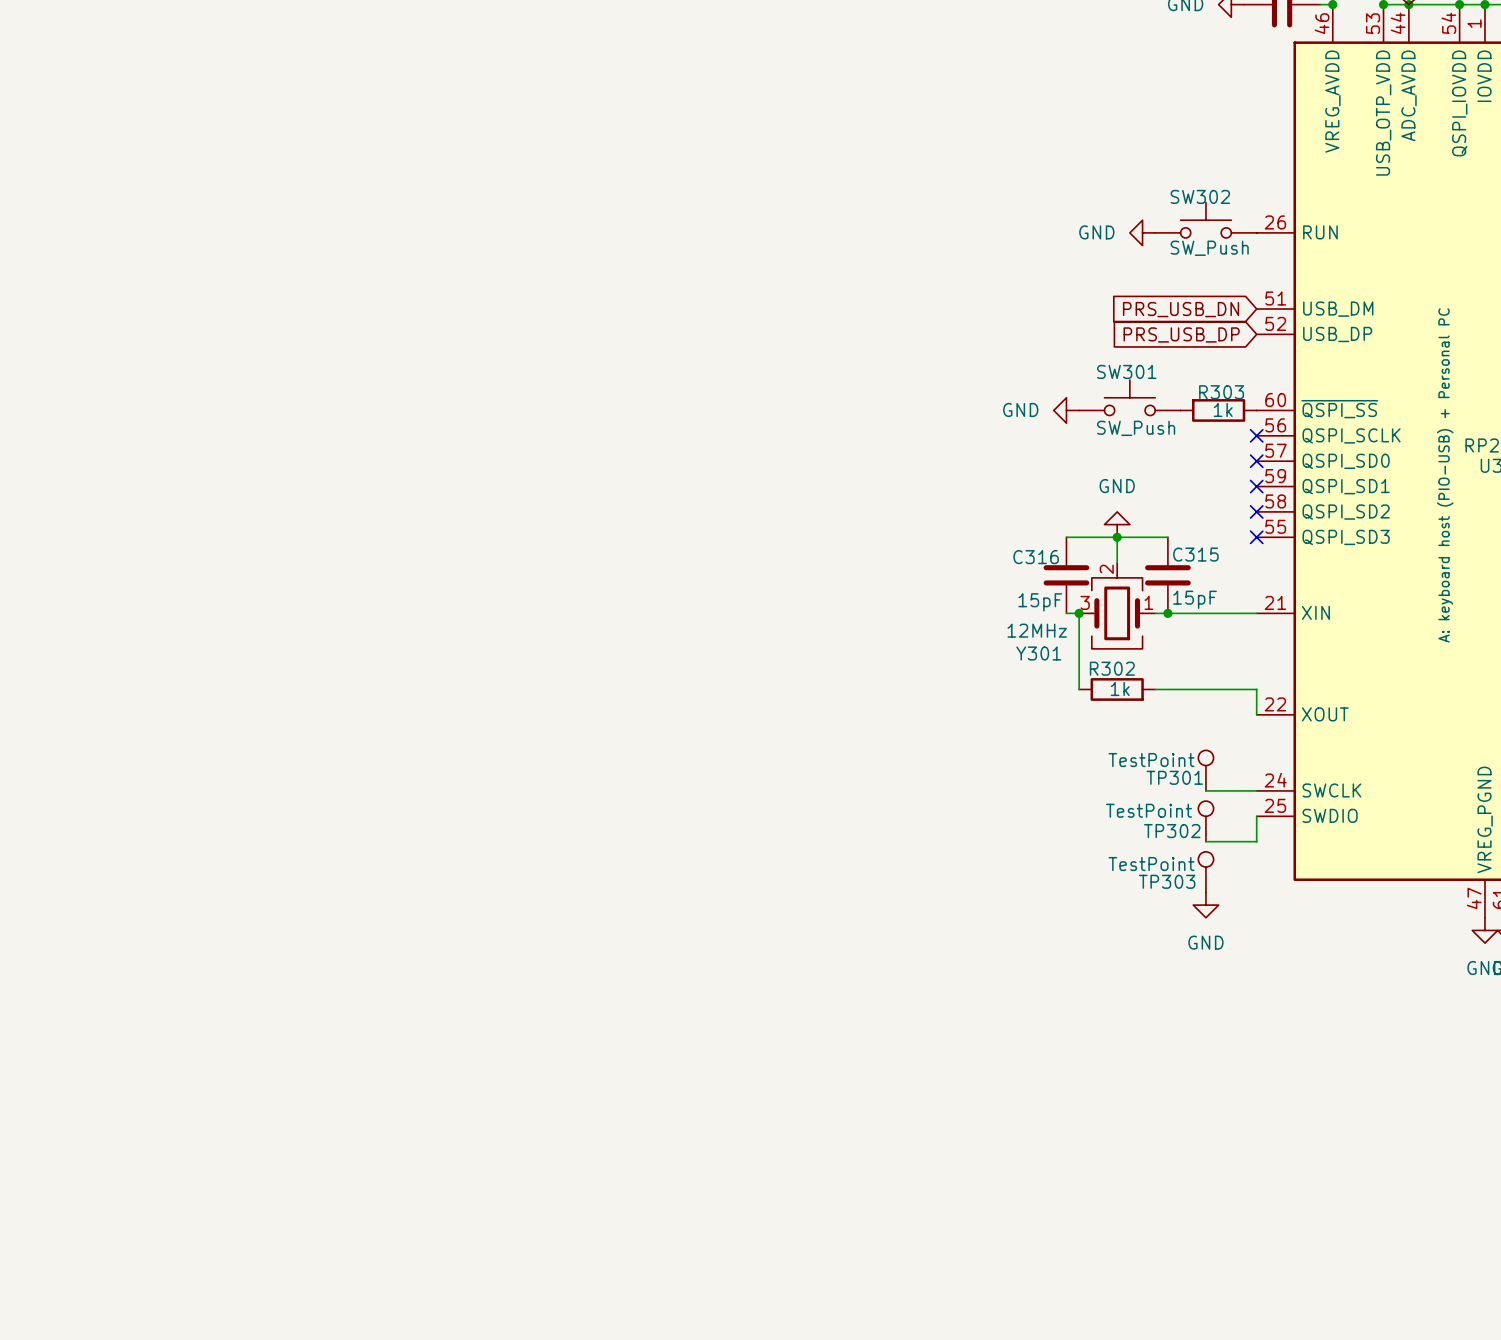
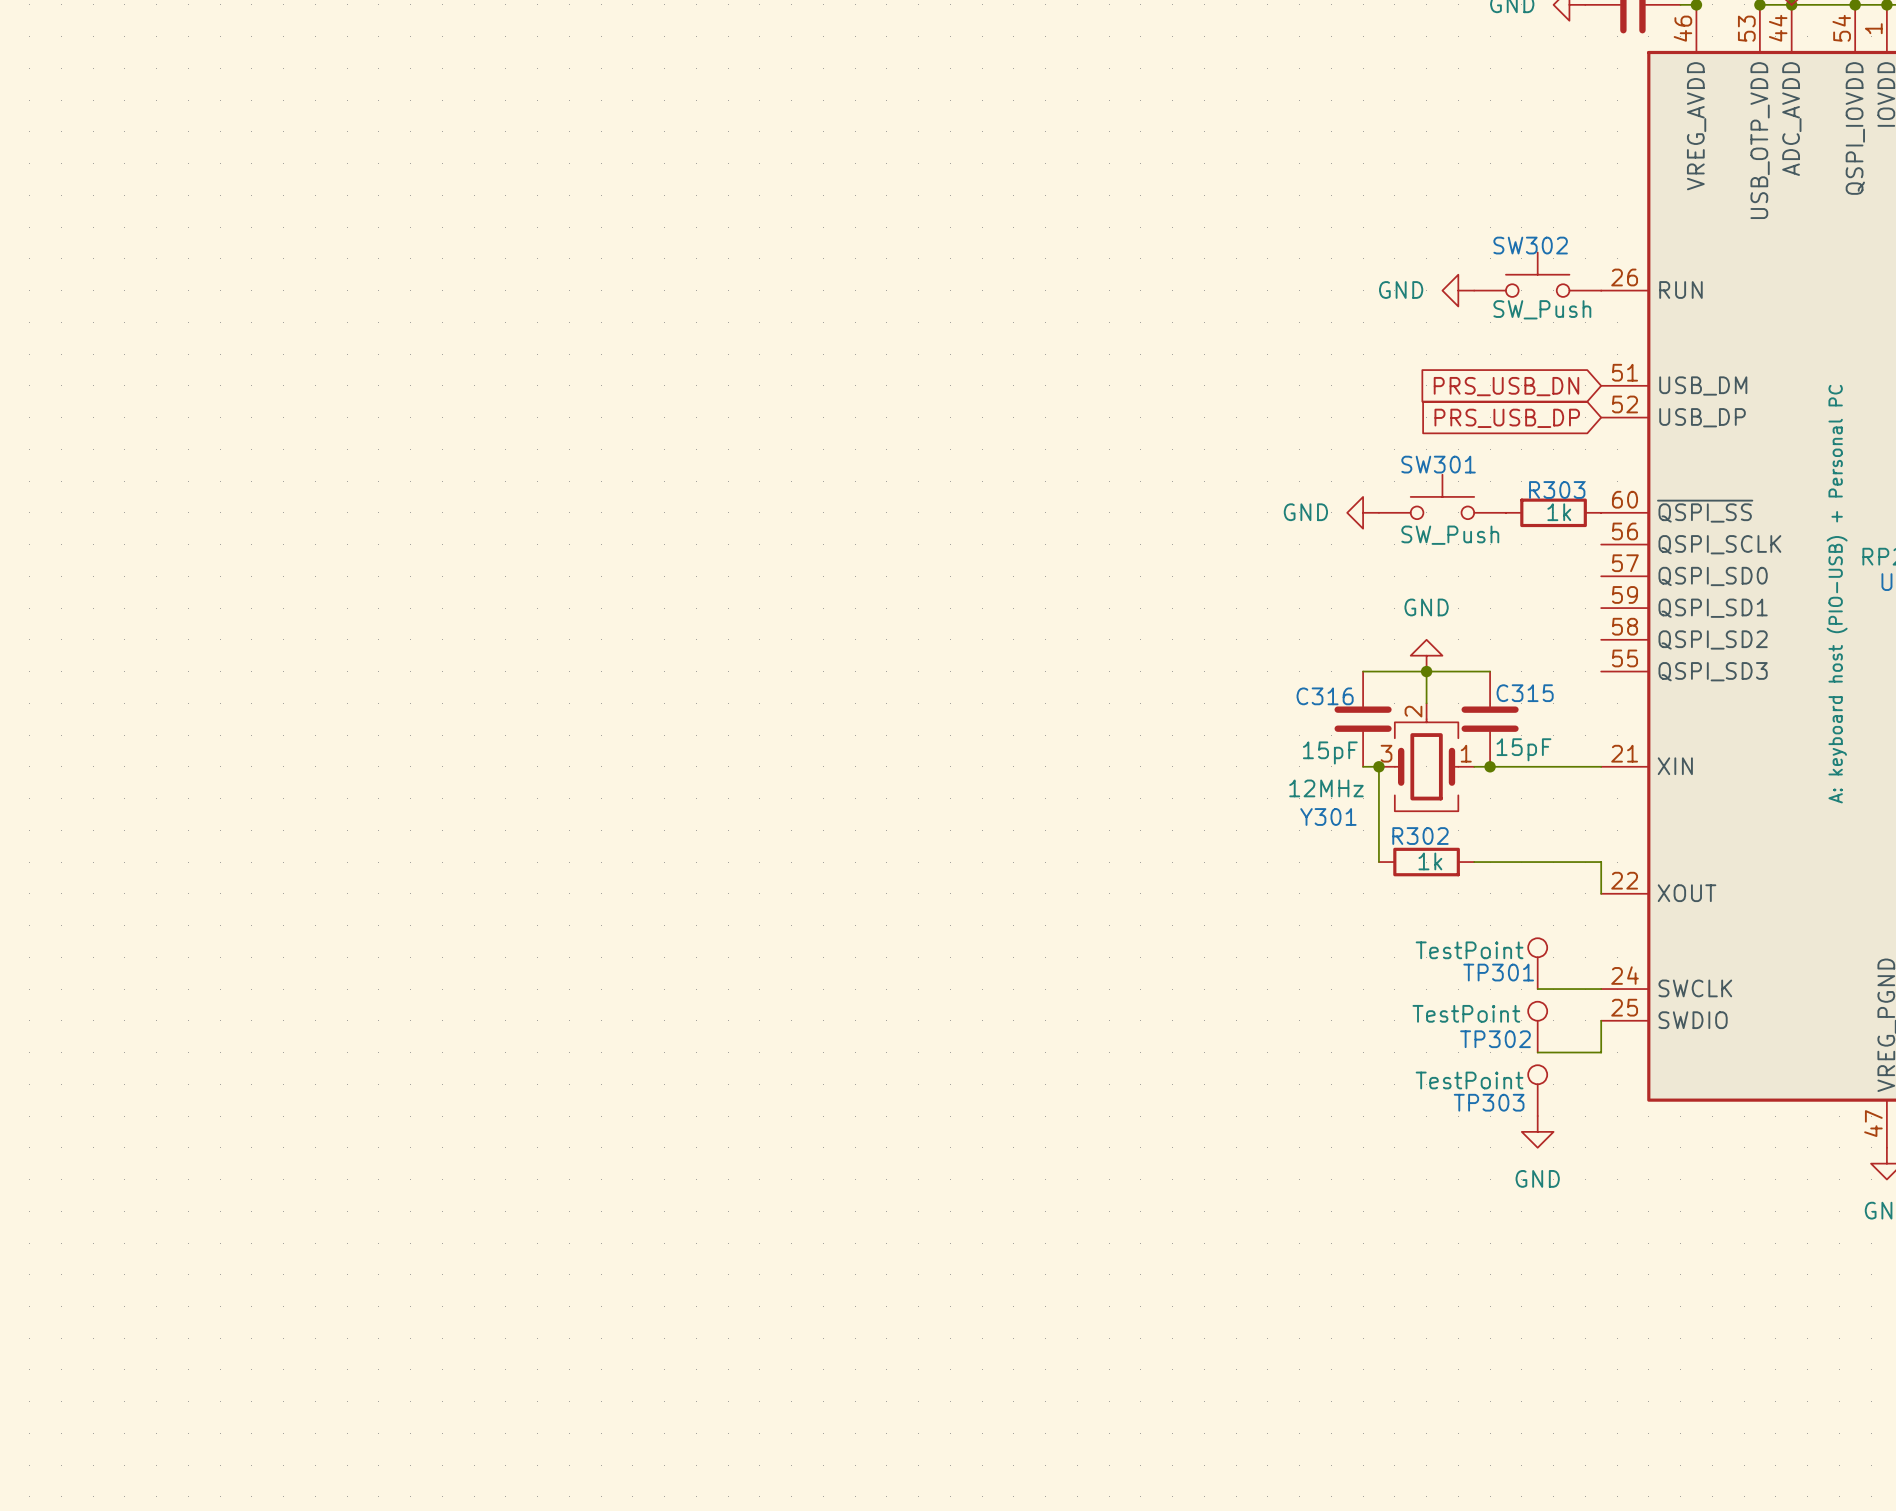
no-connect mark: (1256, 435) -> none
no-connect mark: (1256, 461) -> none
no-connect mark: (1256, 486) -> none
no-connect mark: (1256, 511) -> none
no-connect mark: (1256, 537) -> none

